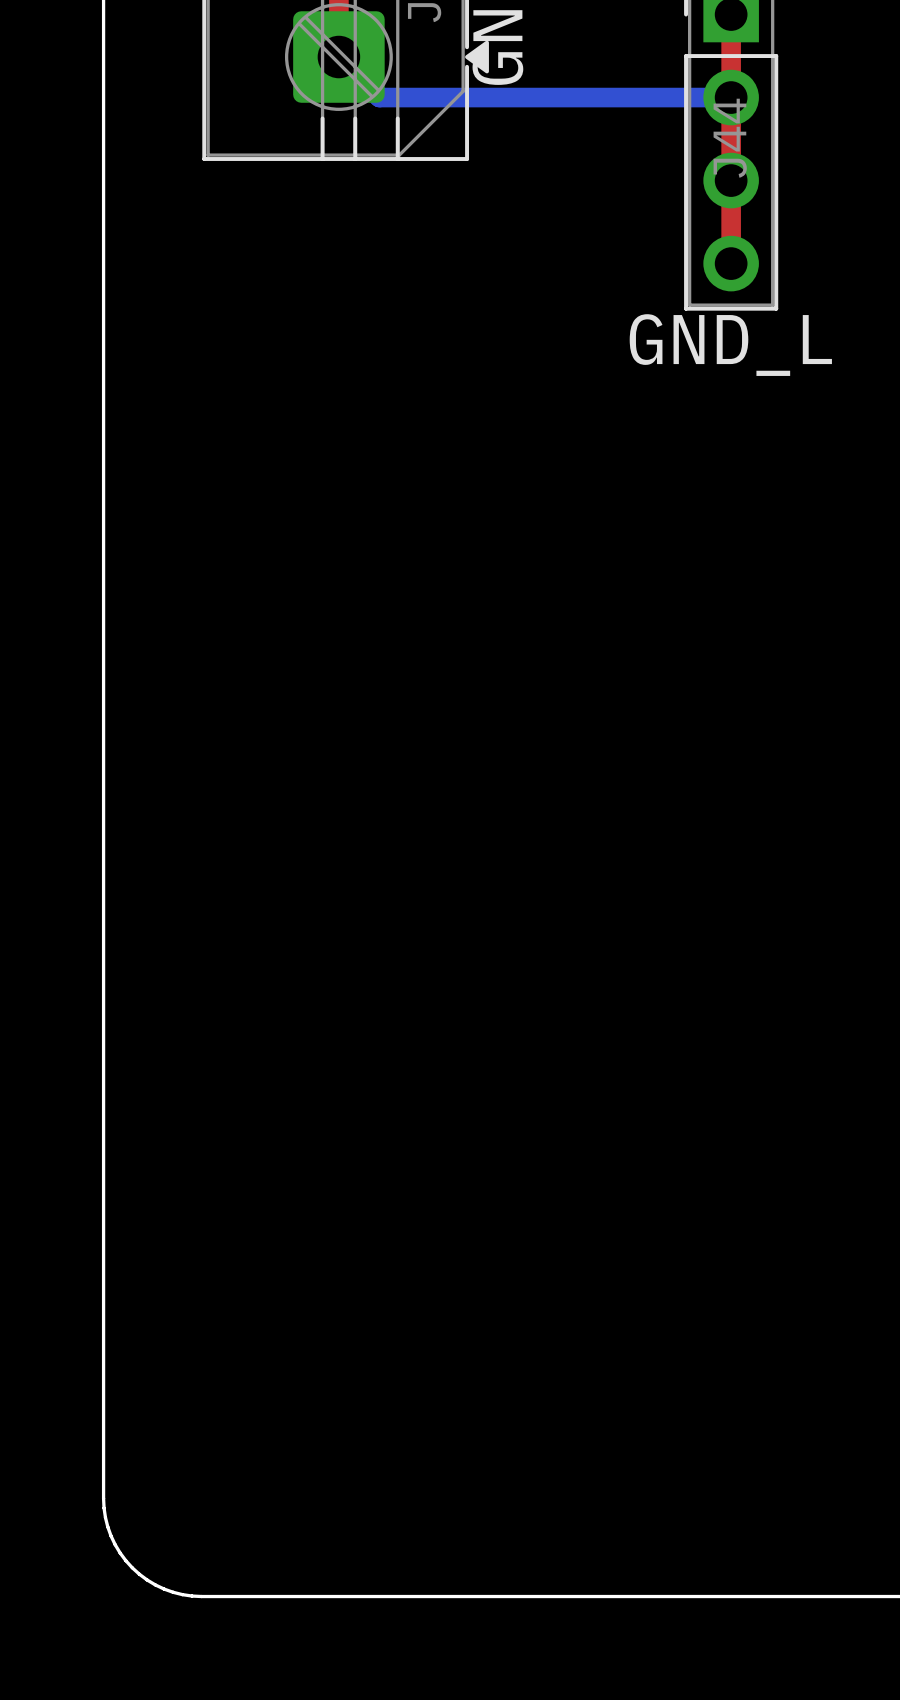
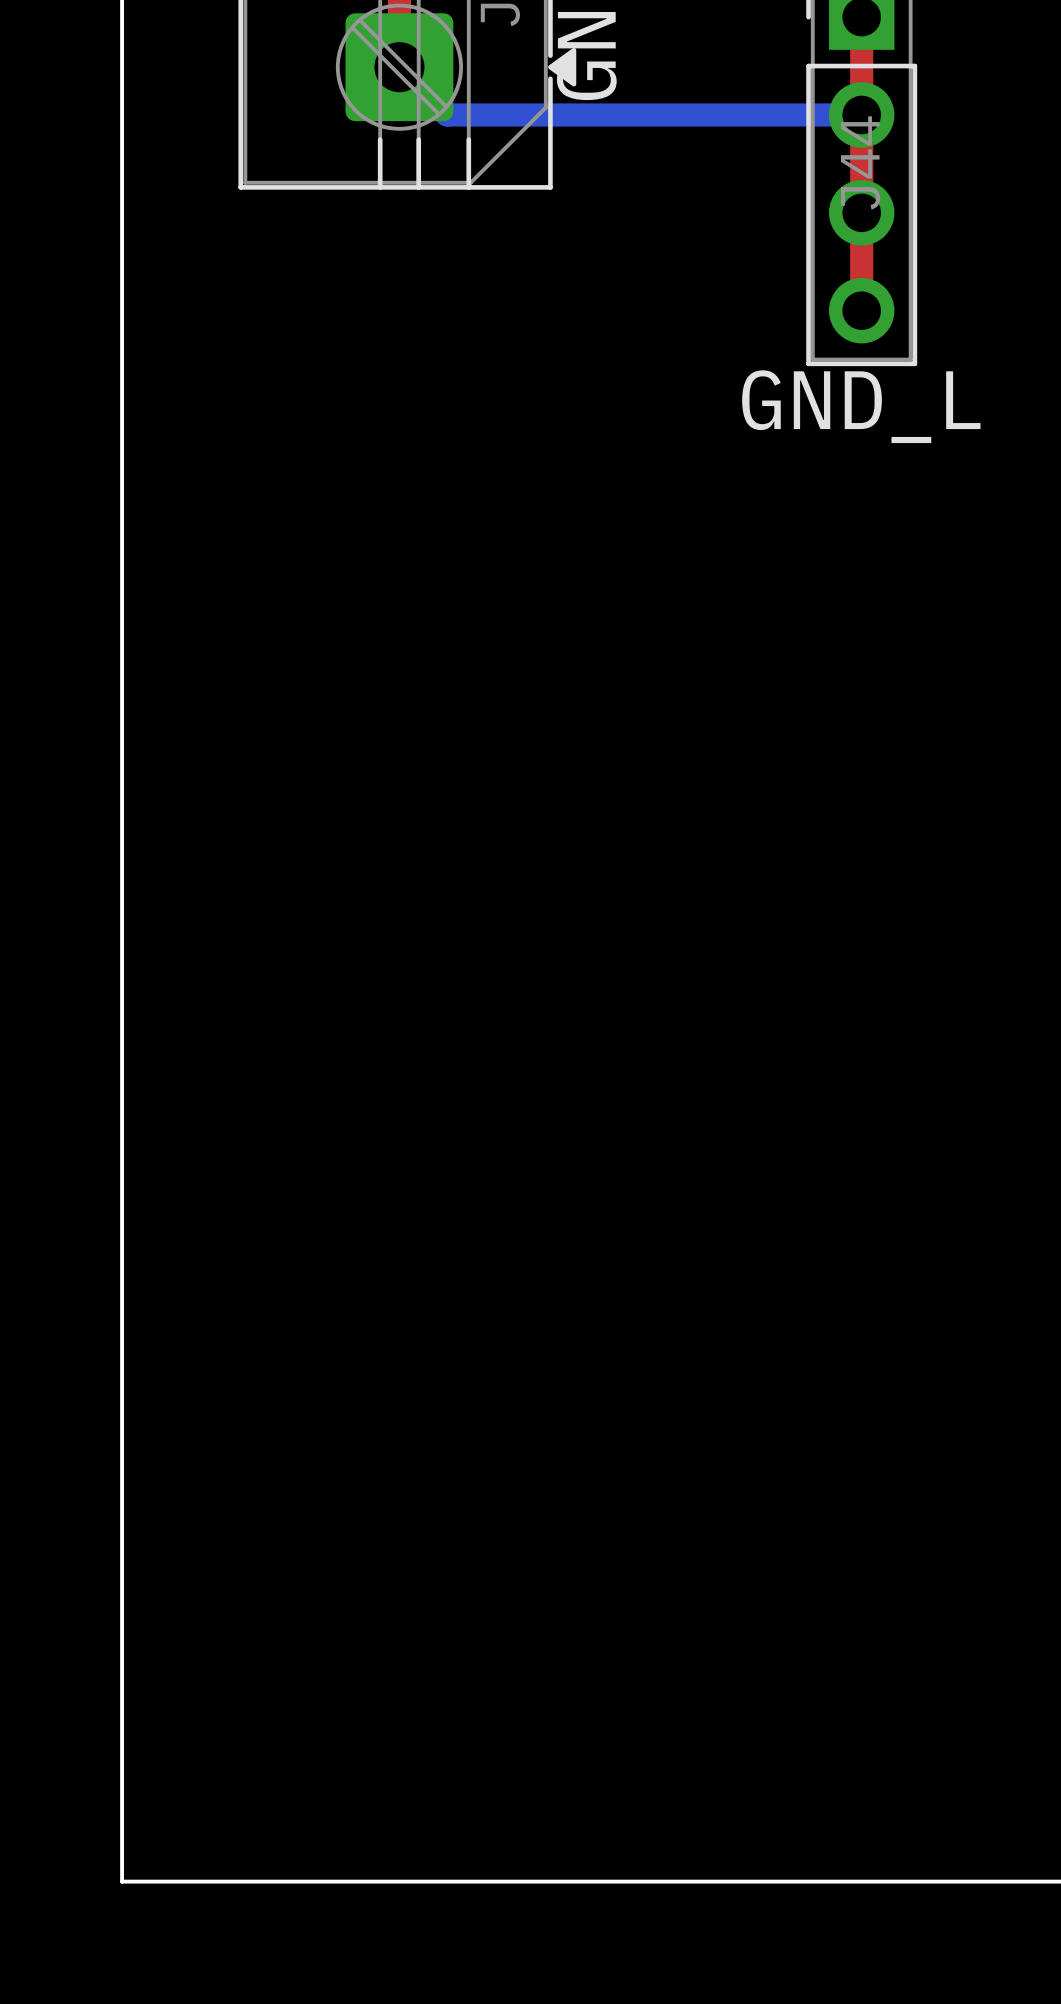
board edge: (103, 1498) (105, 1517) (111, 1535) (120, 1552) (132, 1567) (147, 1579) (164, 1589) (182, 1594) (201, 1596) -> (122, 1766) (122, 1881) (237, 1881)

